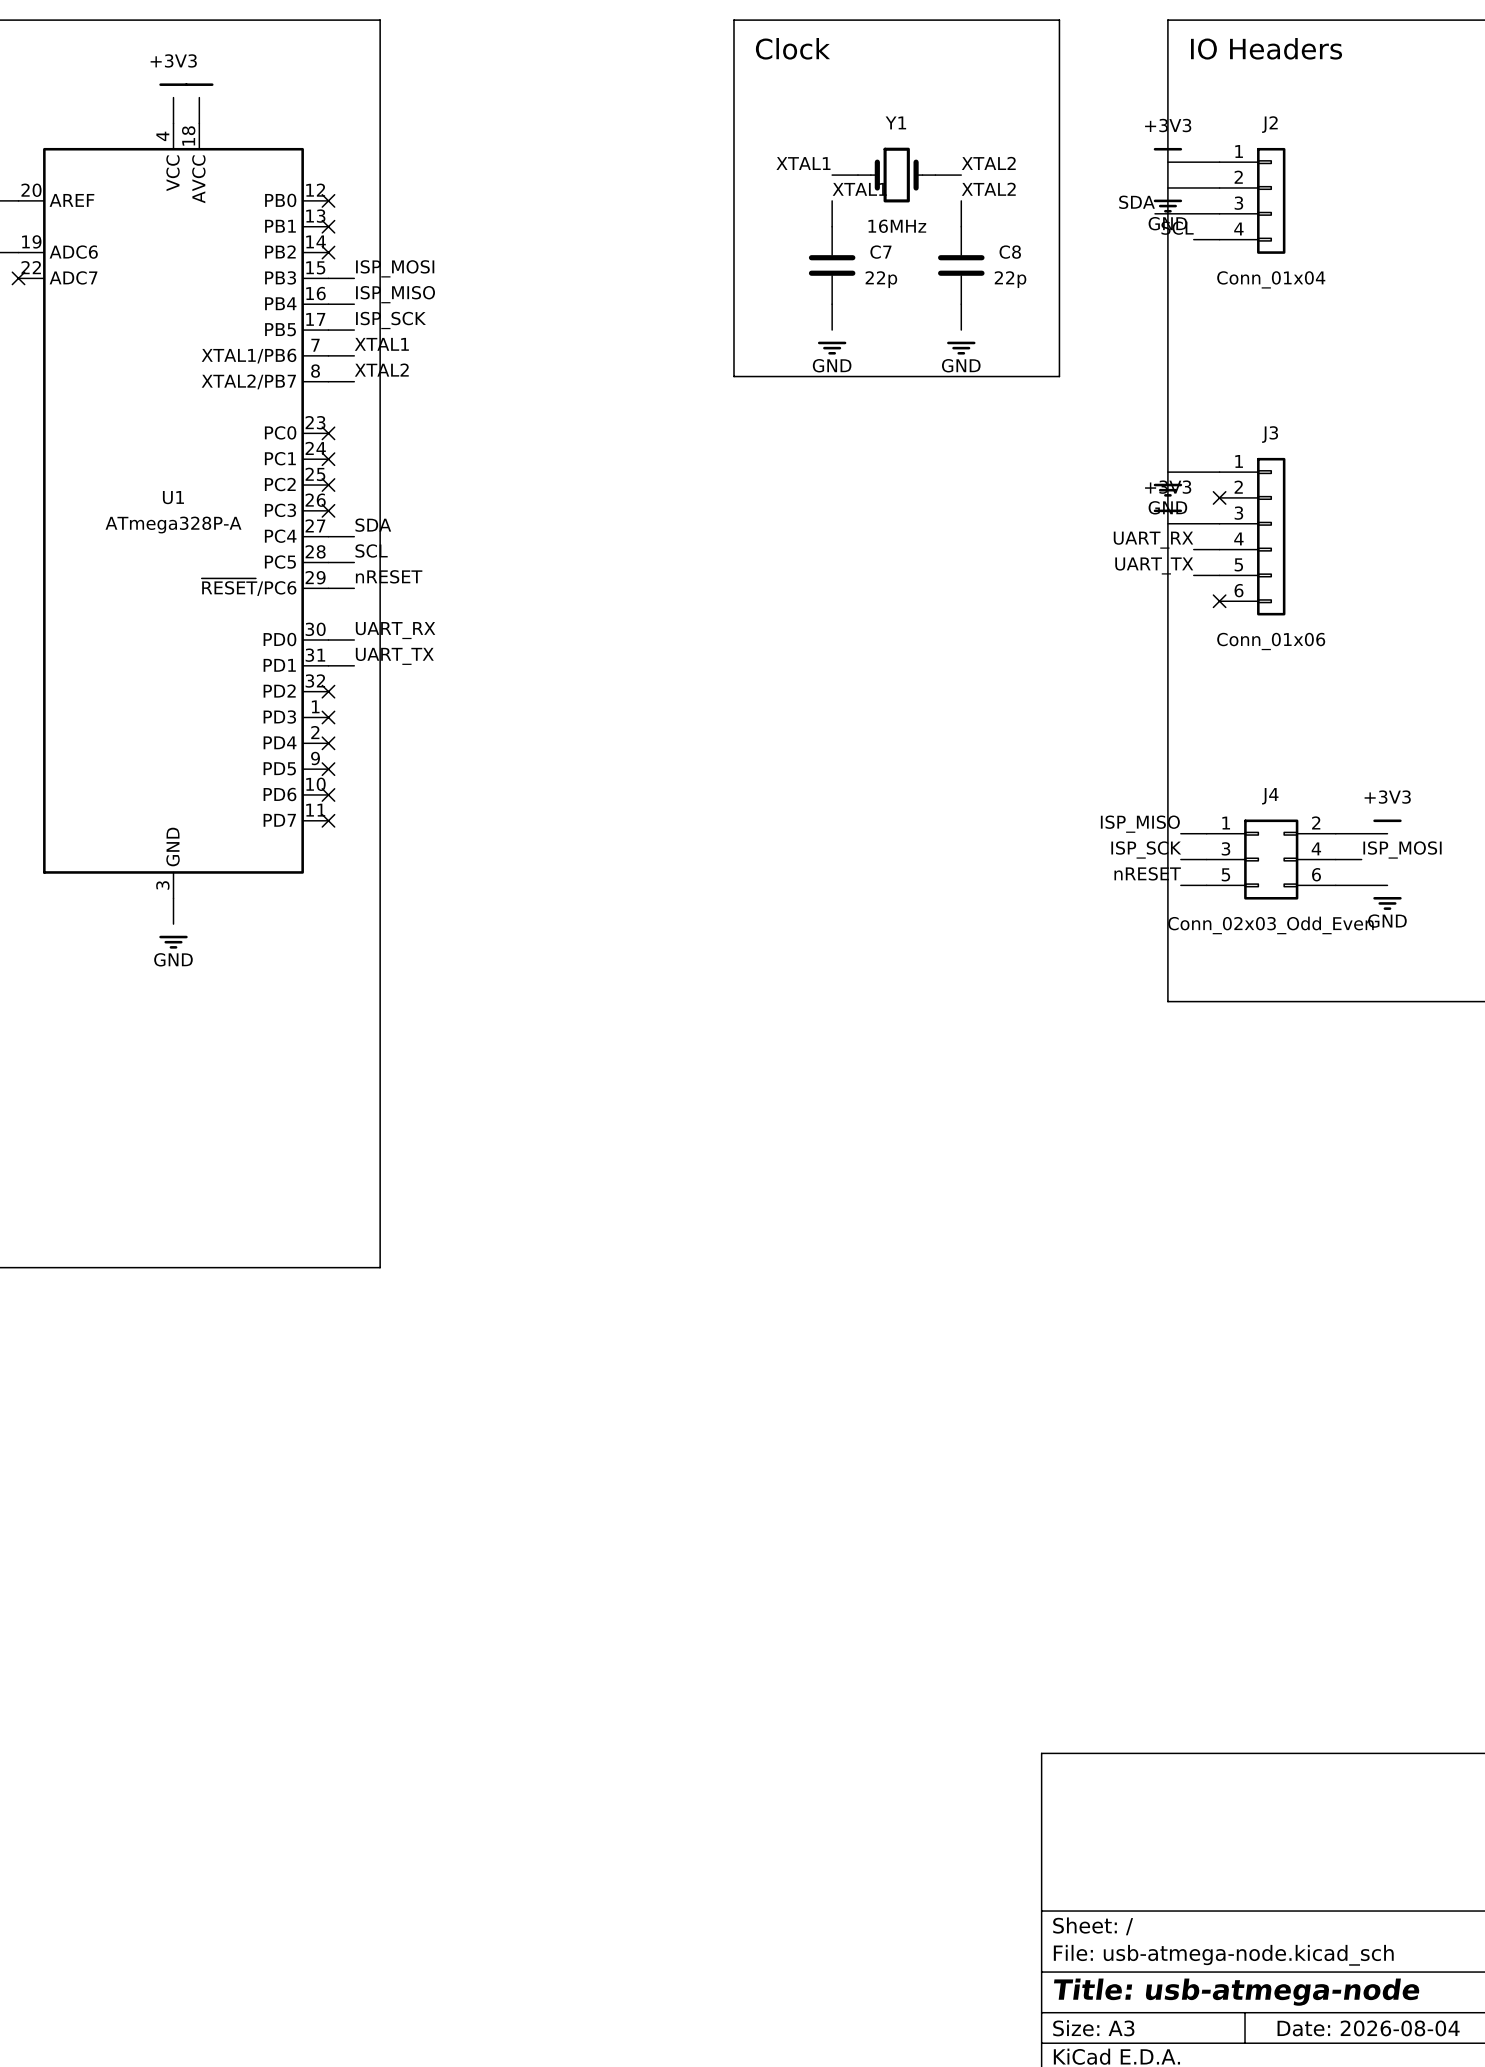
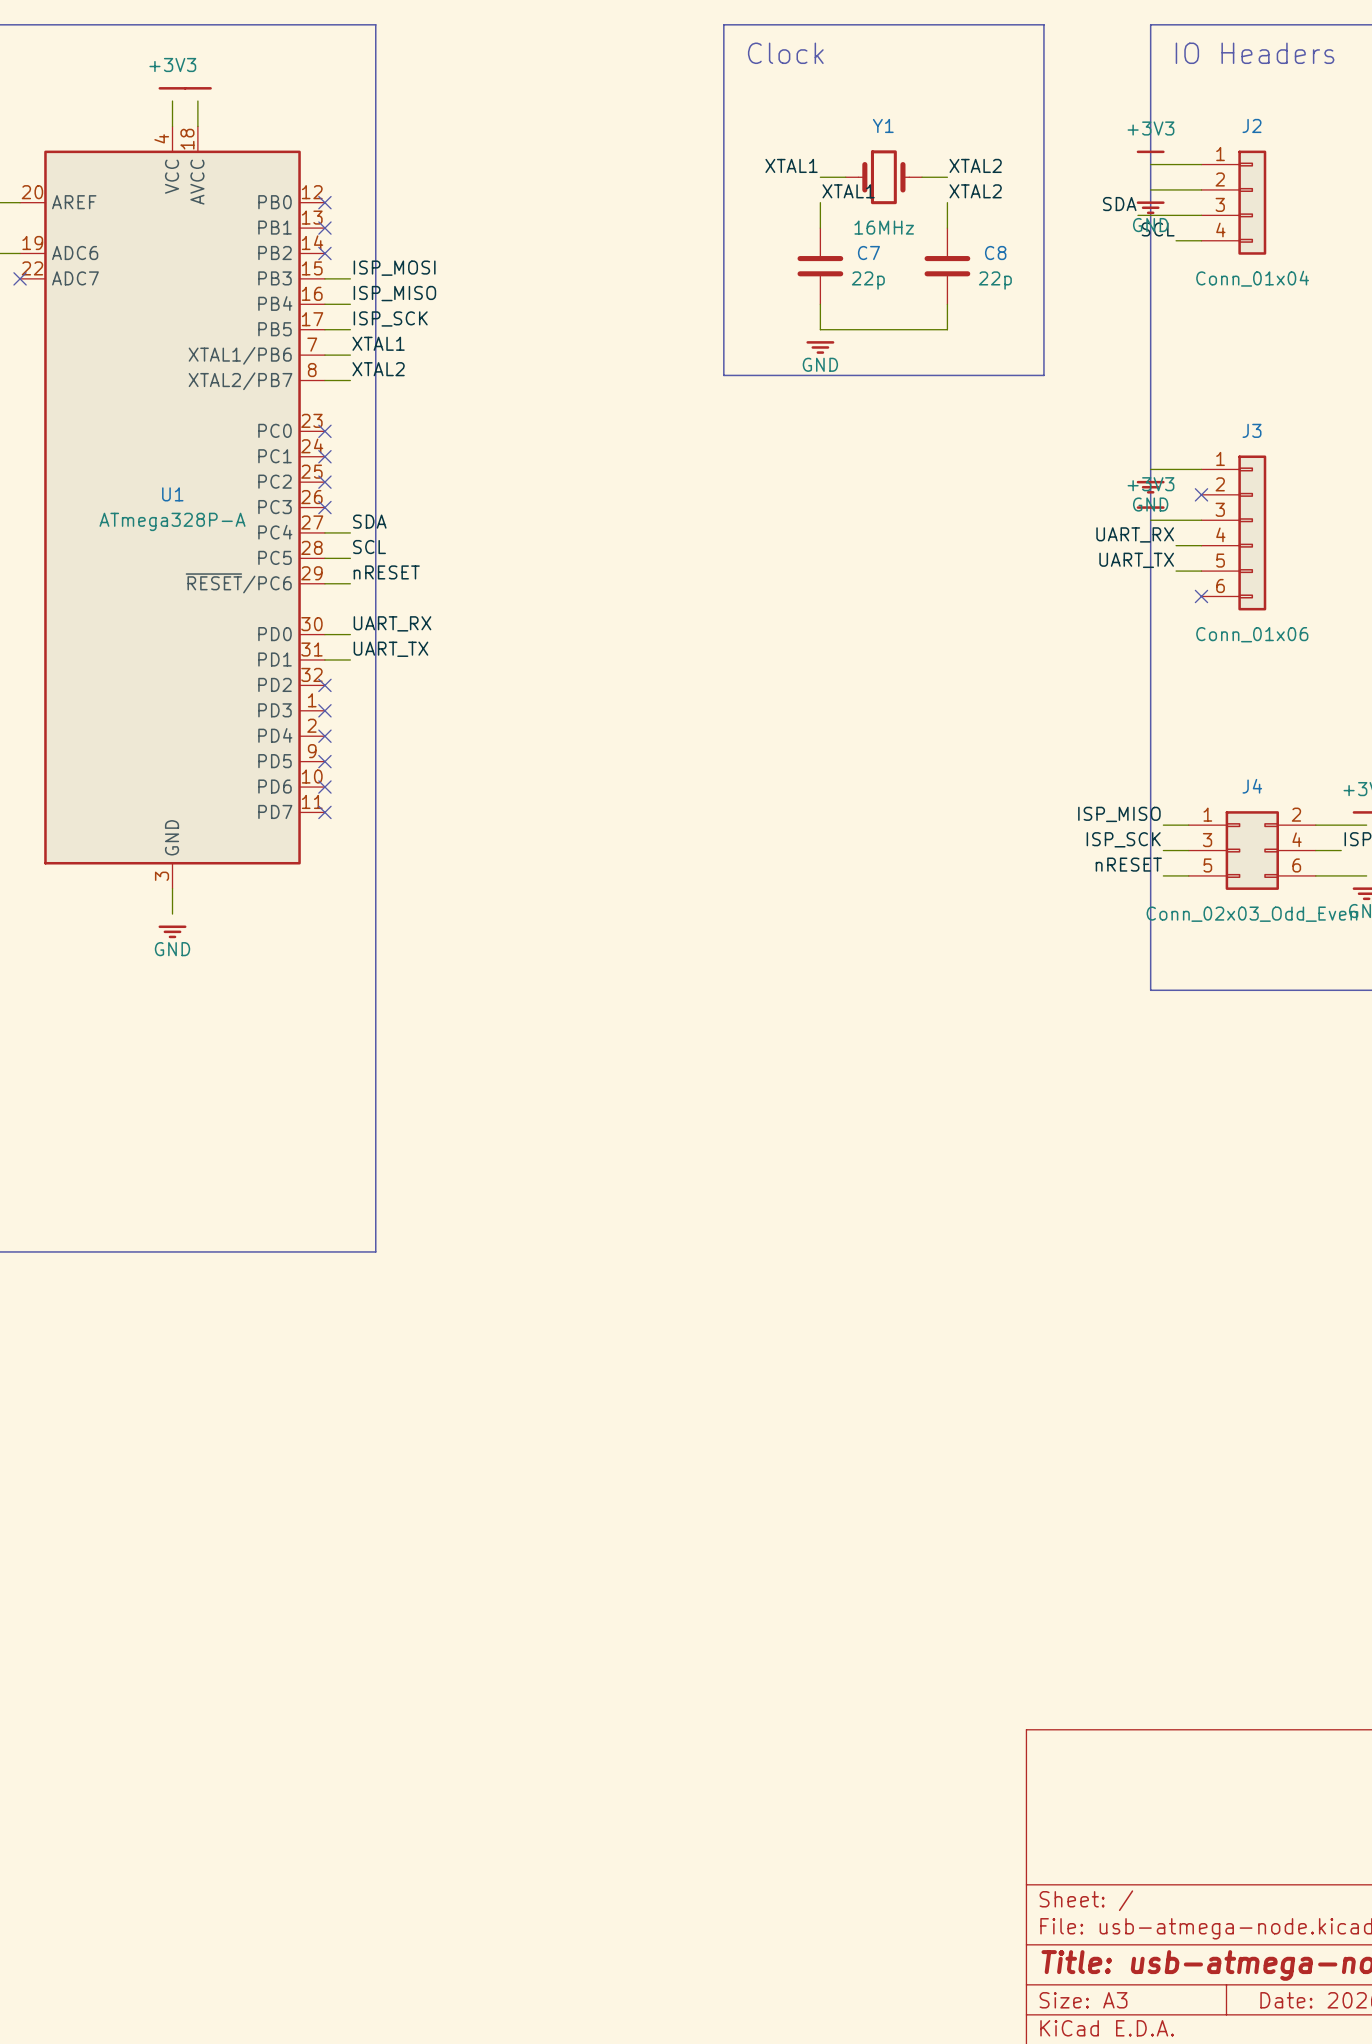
wire: none -> (820, 329) (947, 329)
power symbol: GND (961, 348) -> none

